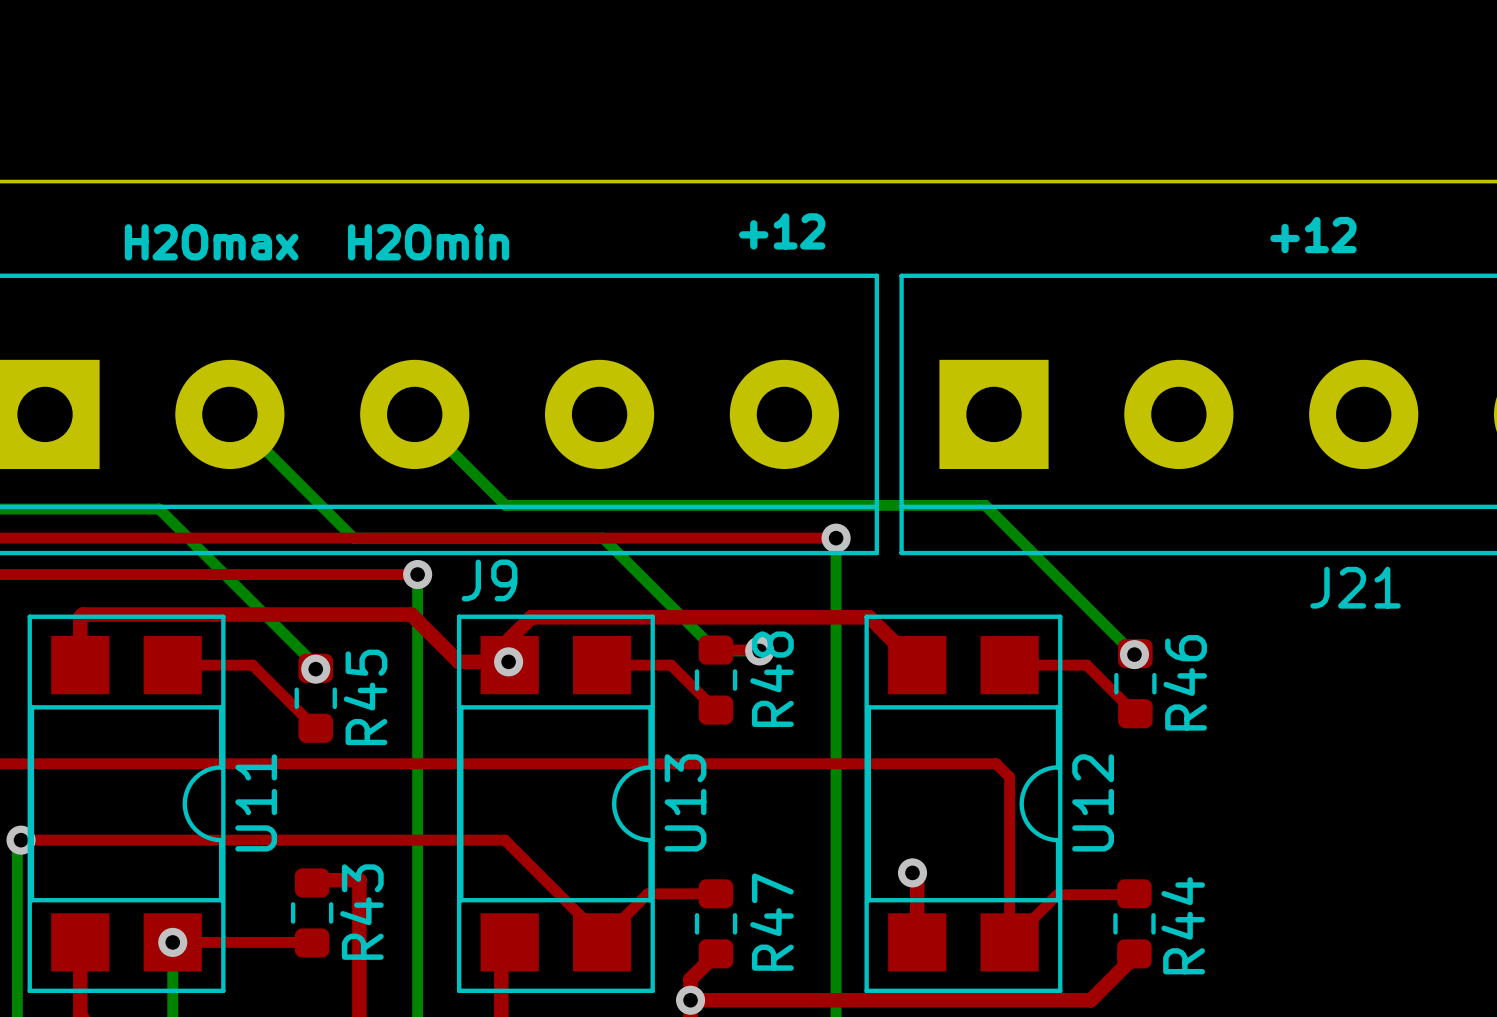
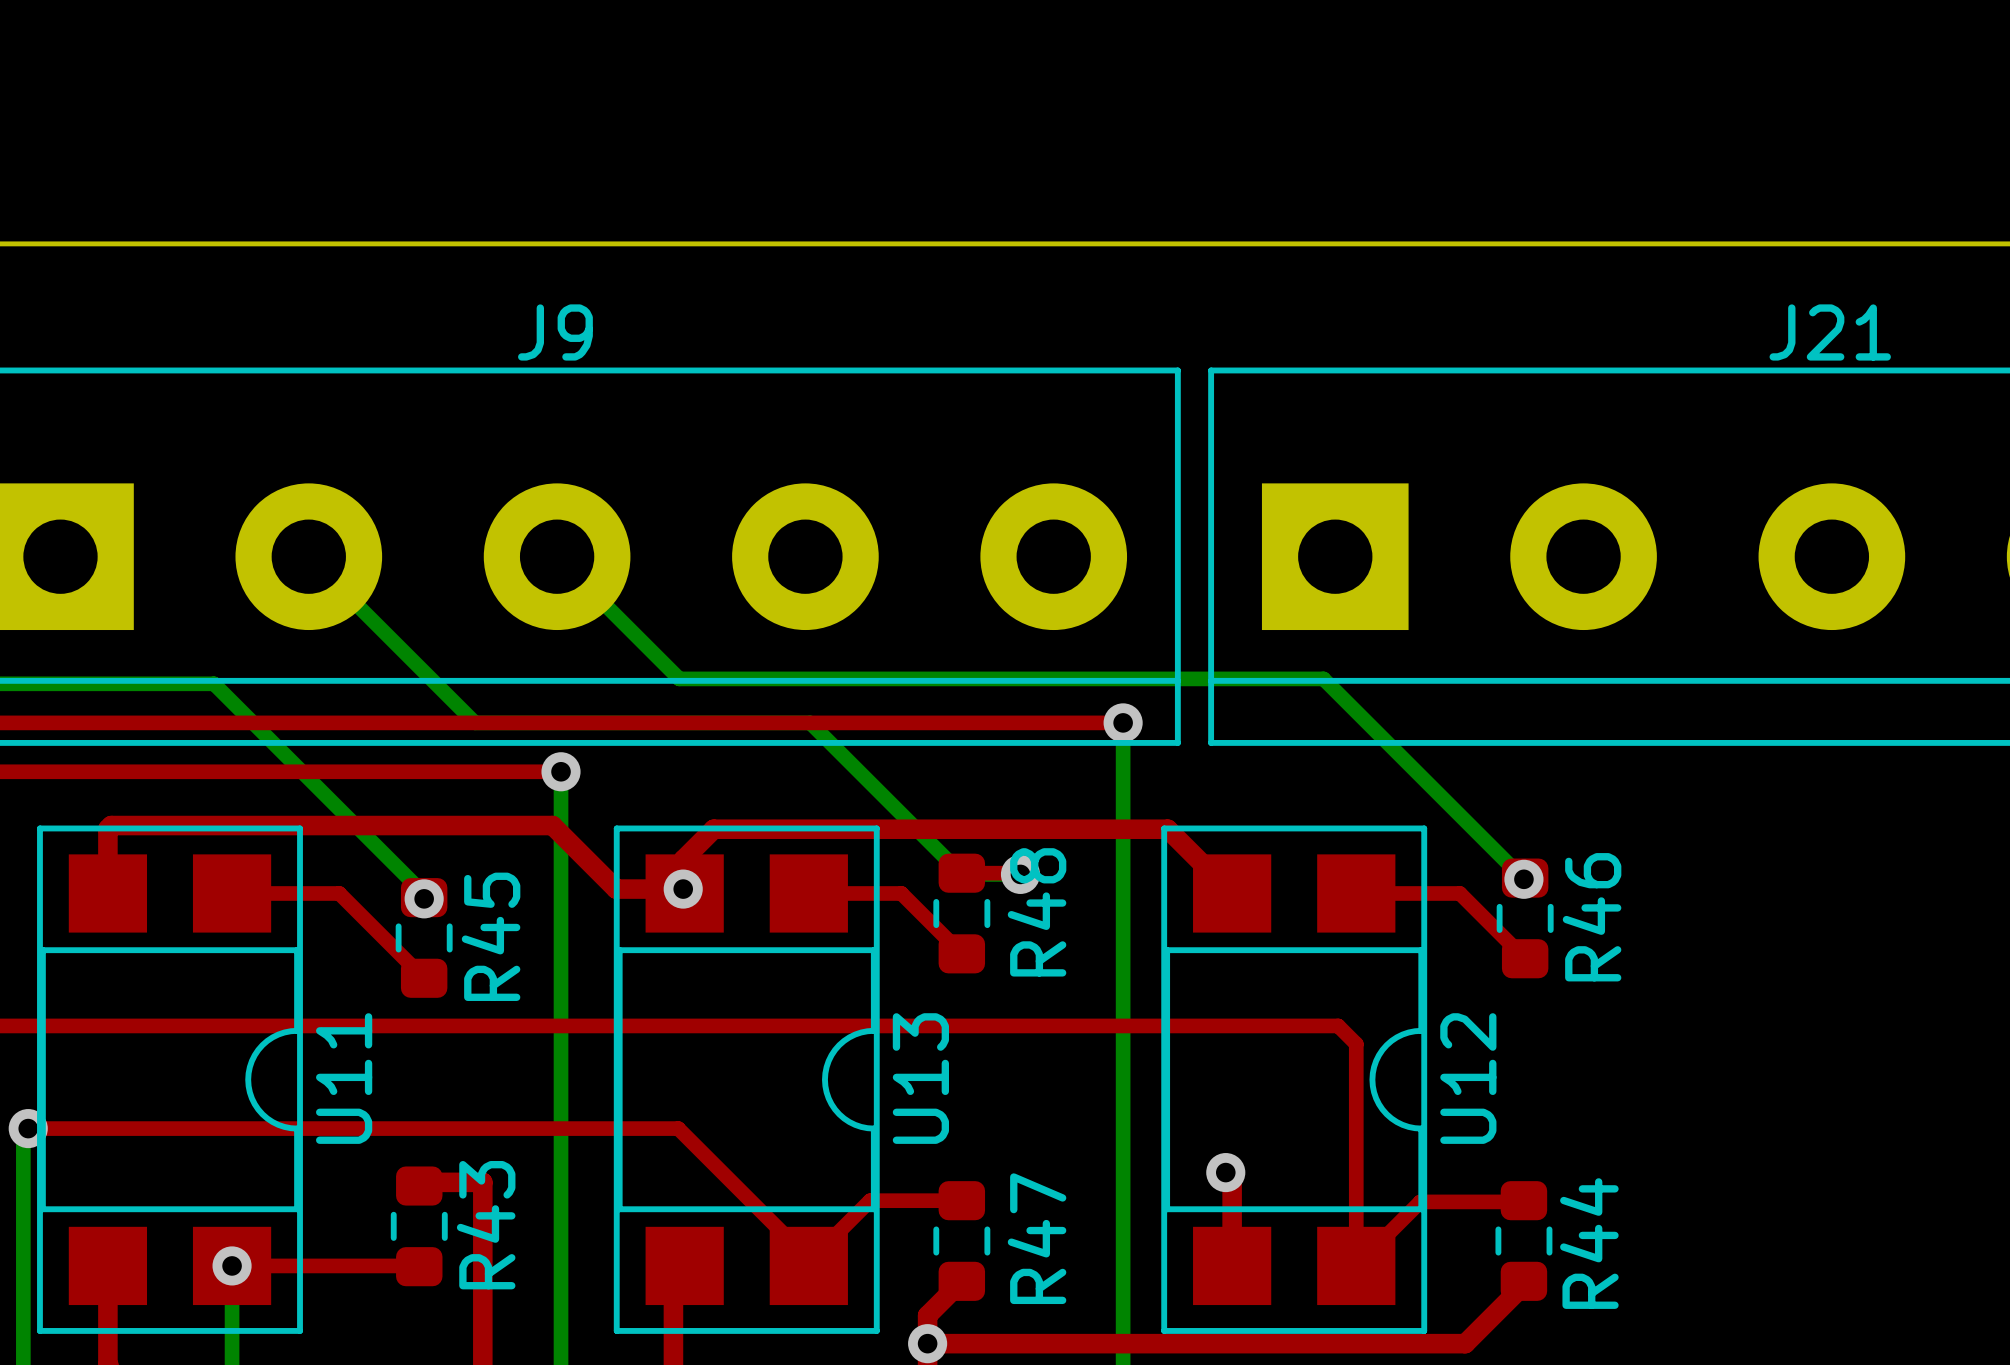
text: +12 (782, 231) -> none
text: +12 (1313, 235) -> none
text: H2Omax (211, 242) -> none
text: H2Omin (428, 242) -> none
J9 name position: J9 (489, 580) -> J9 (555, 332)
J21 name position: J21 (1355, 587) -> J21 (1830, 332)

